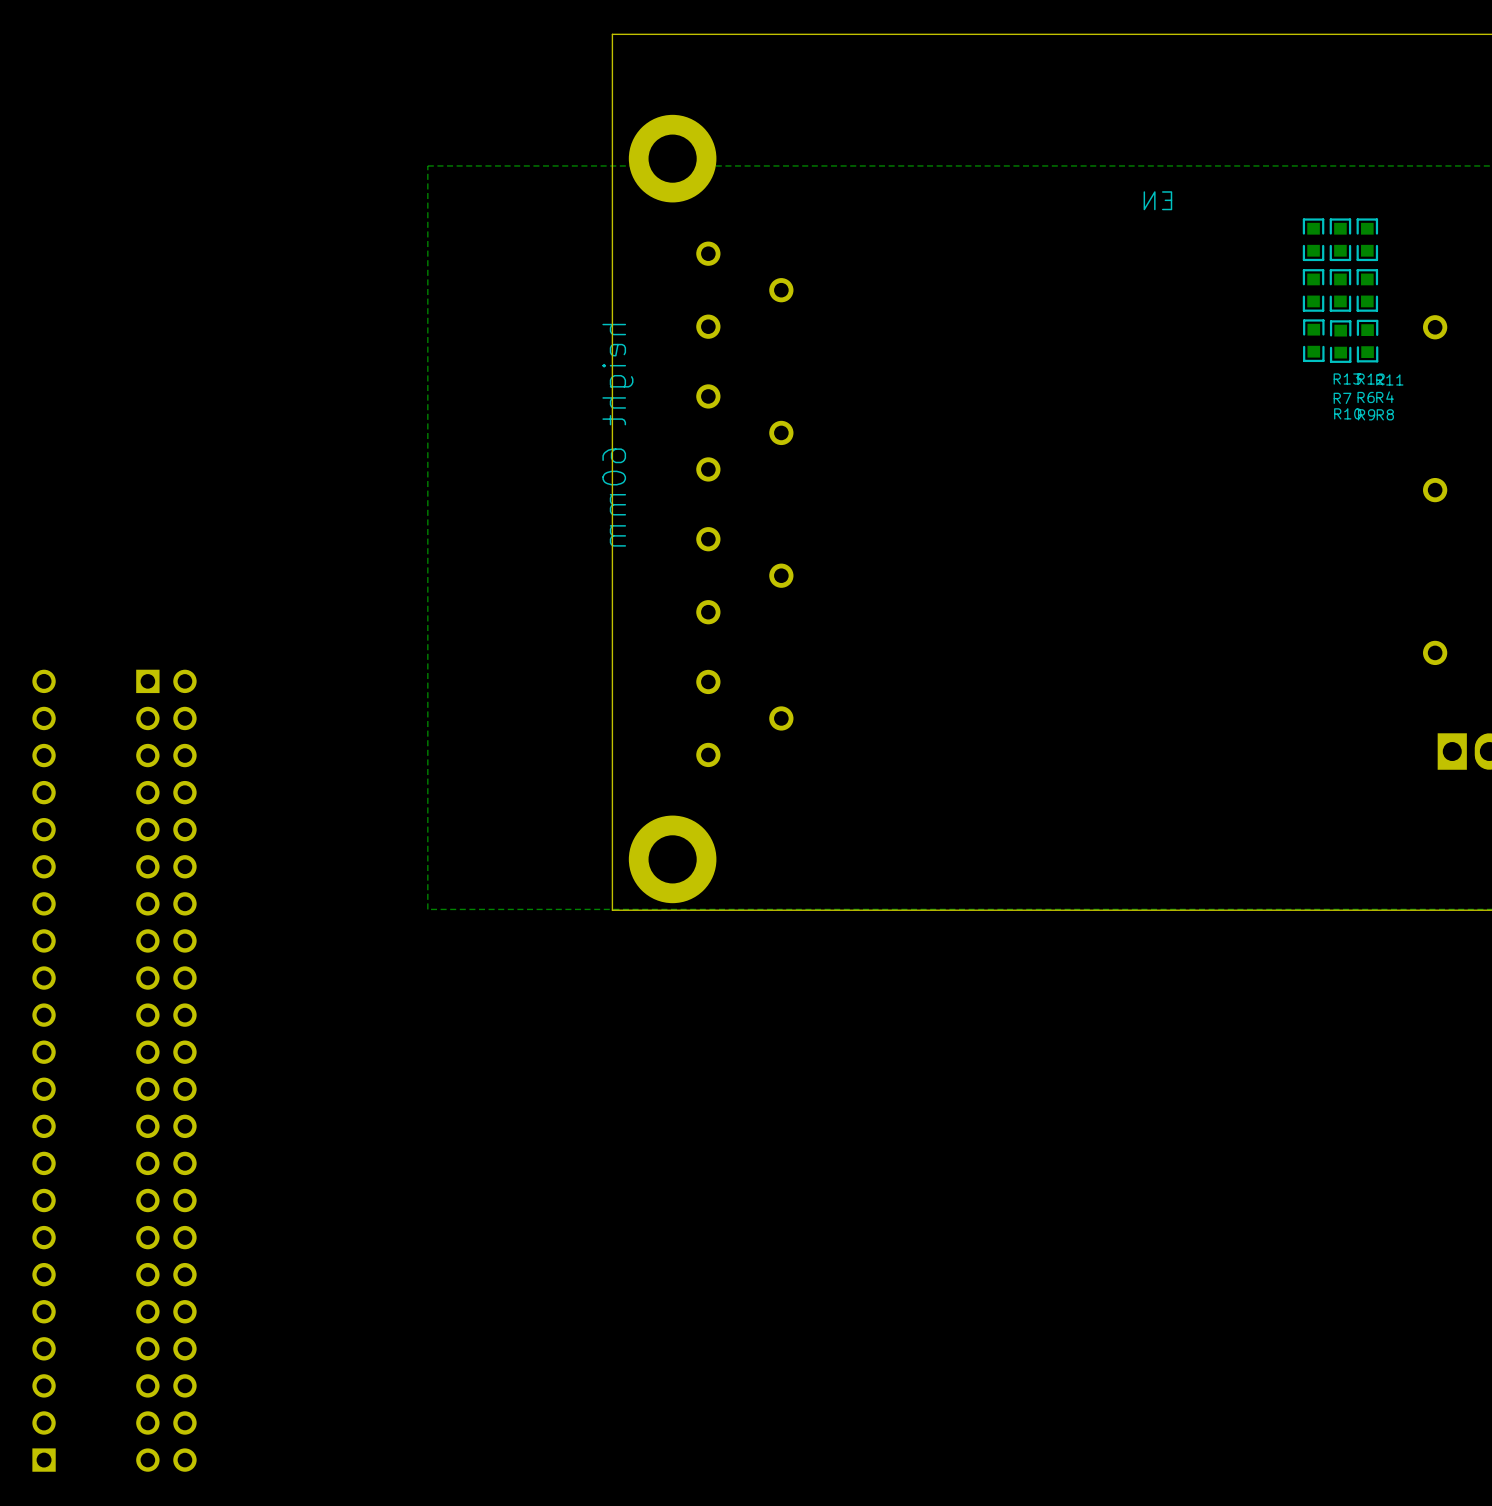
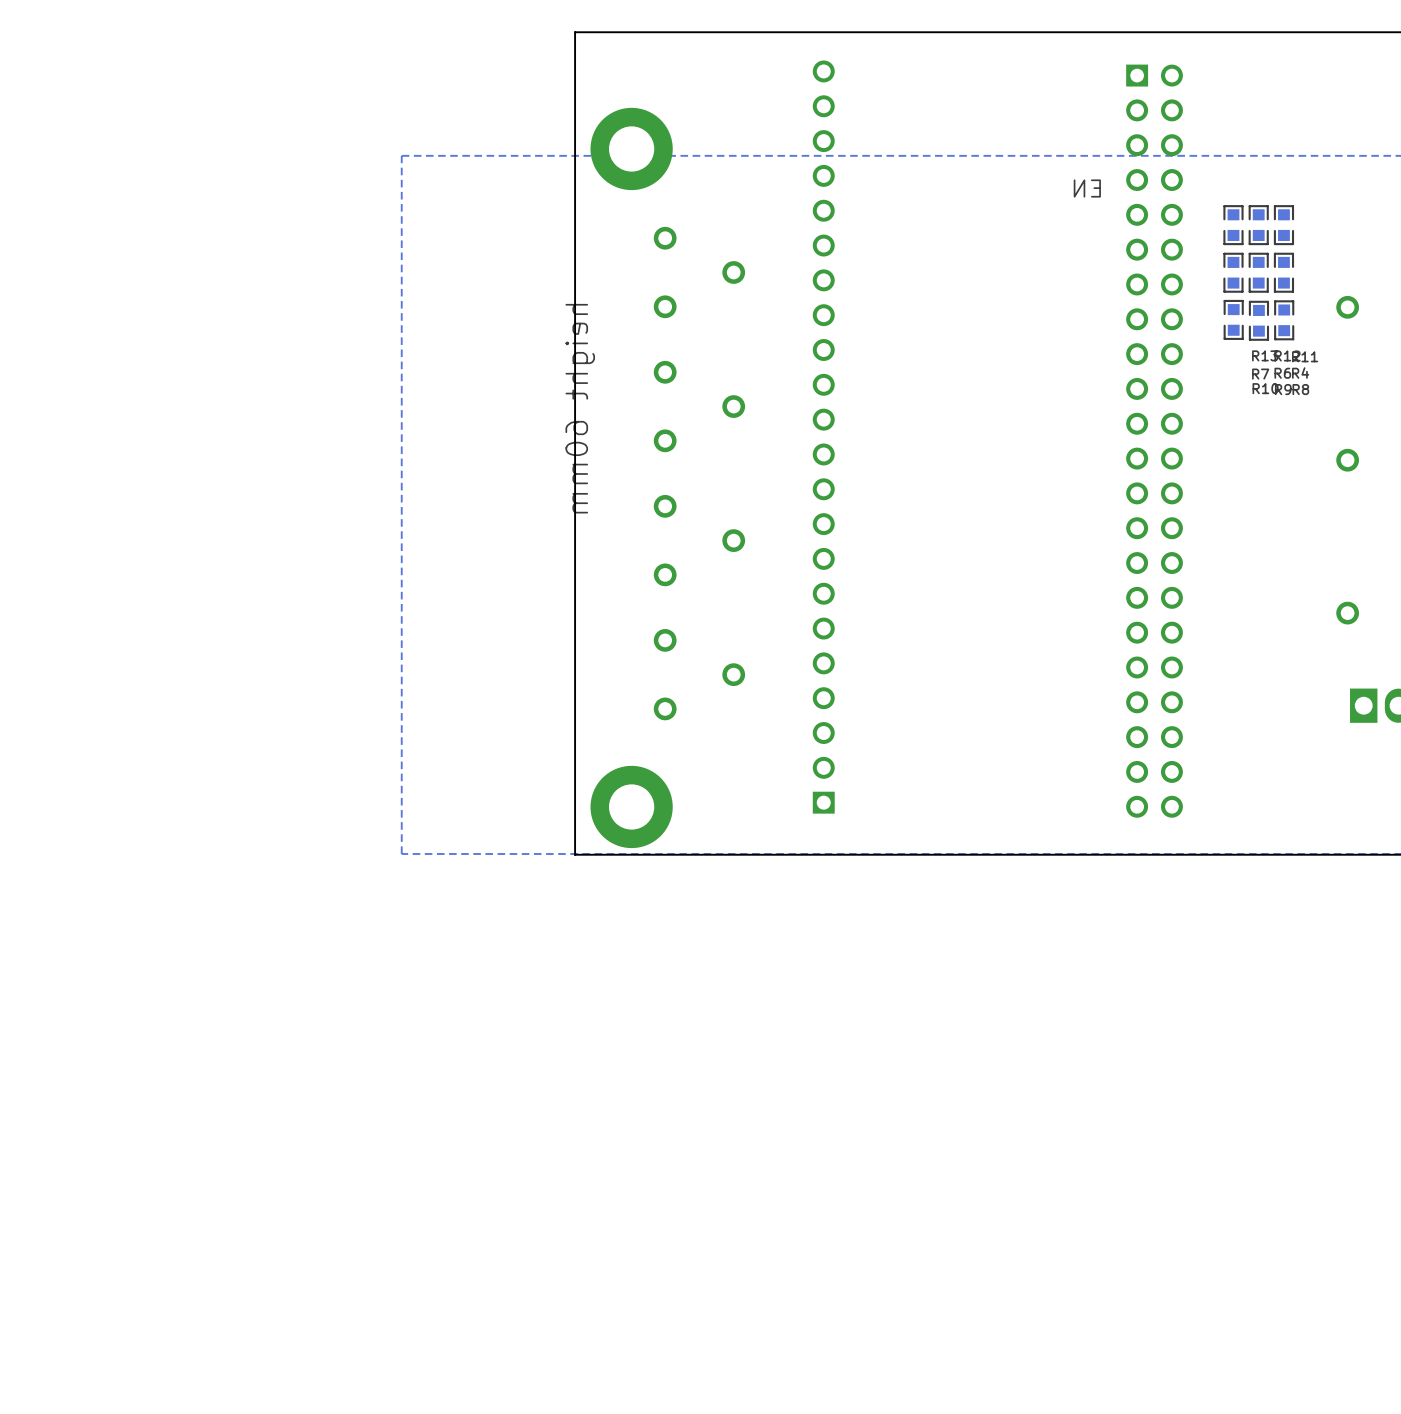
part: none -> (823, 437)
part: none -> (1154, 441)
part: (44, 1070) -> none
part: (166, 1070) -> none

